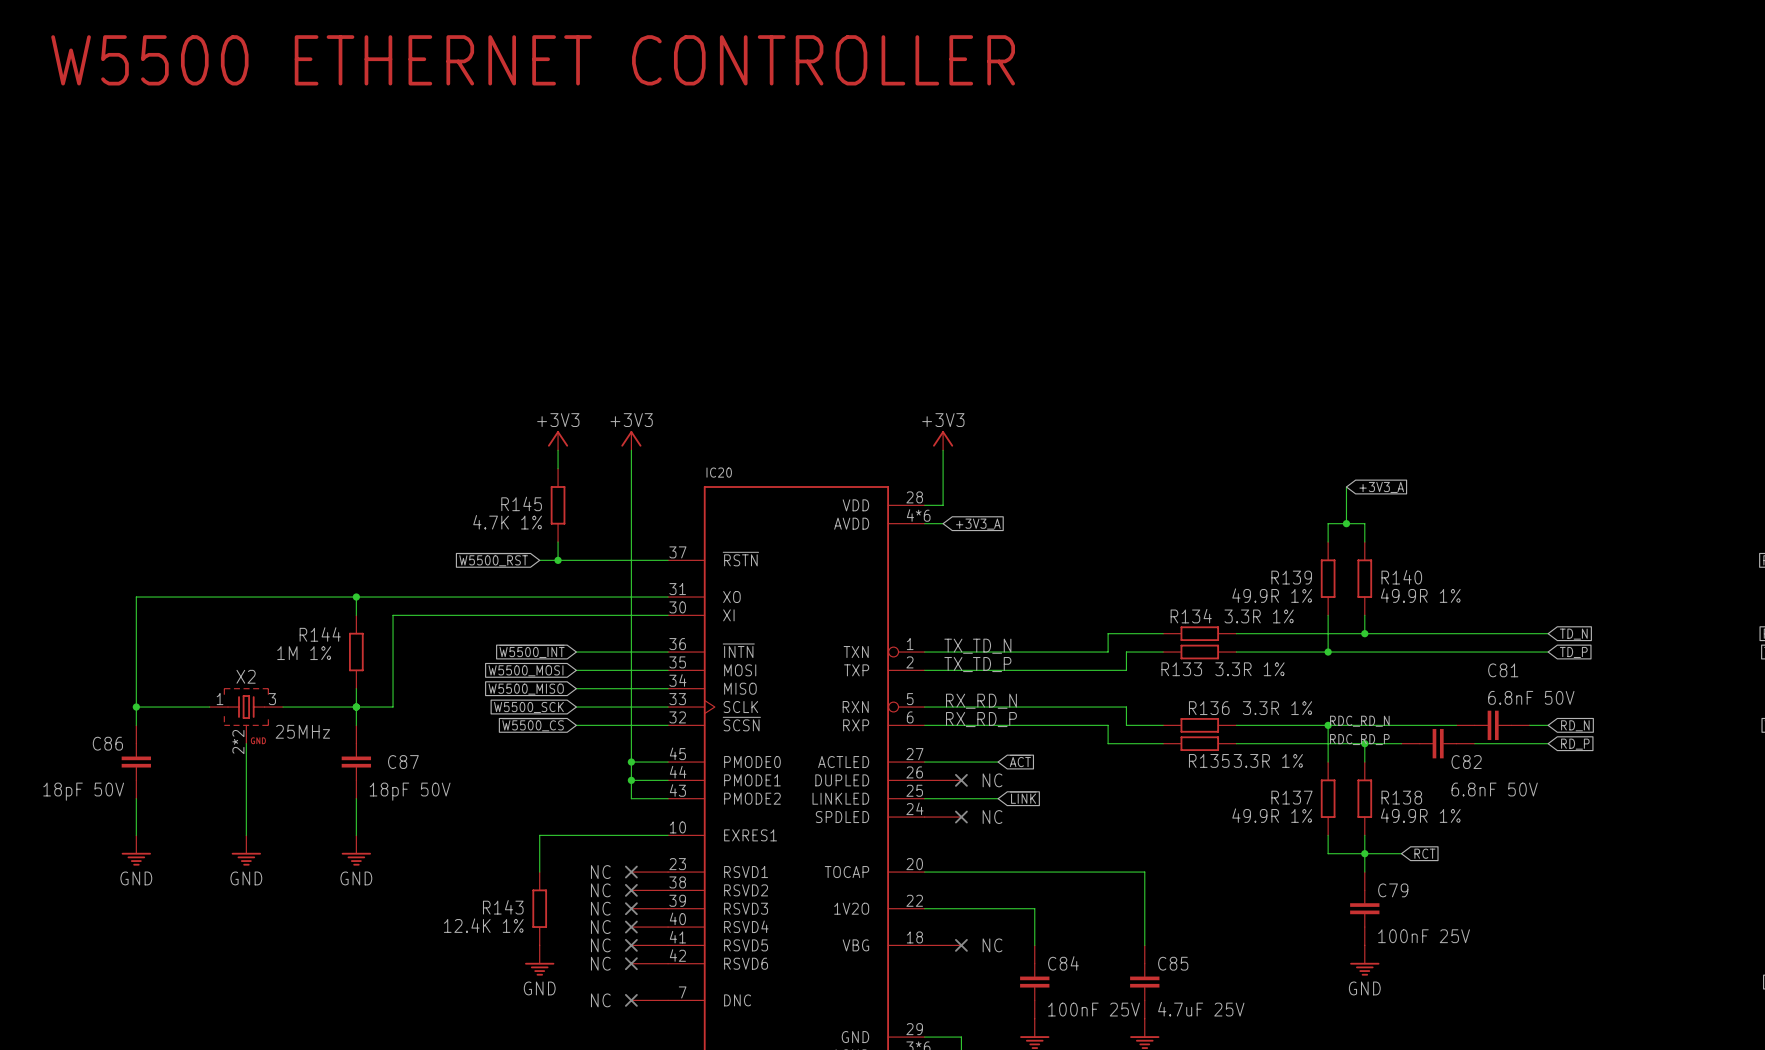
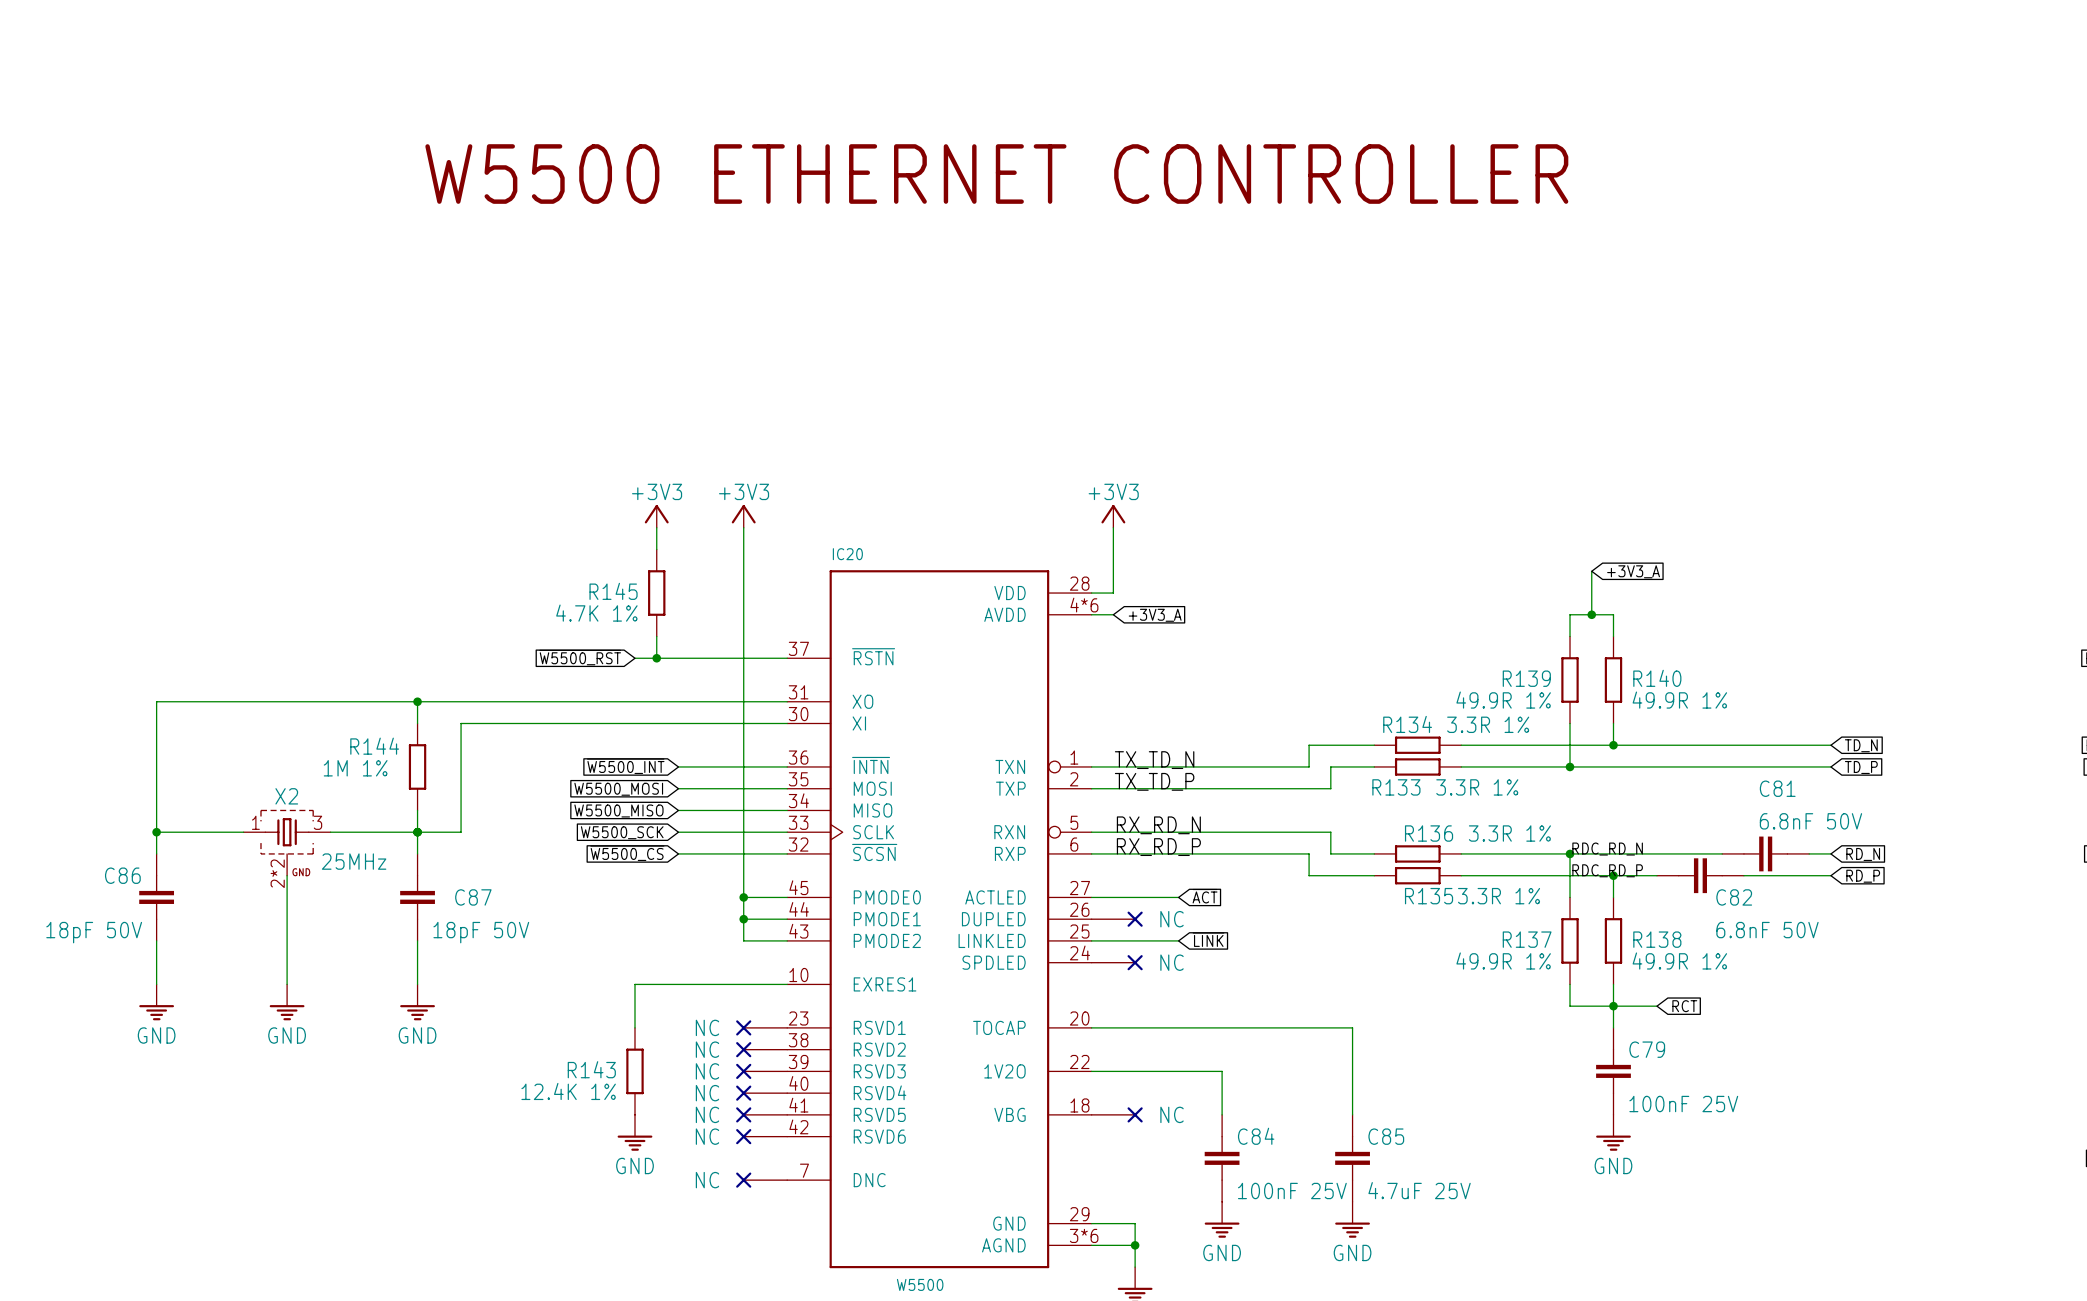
text: W5500 ETHERNET CONTROLLER (533, 60) -> none
text: none -> W5500 ETHERNET CONTROLLER (996, 174)

